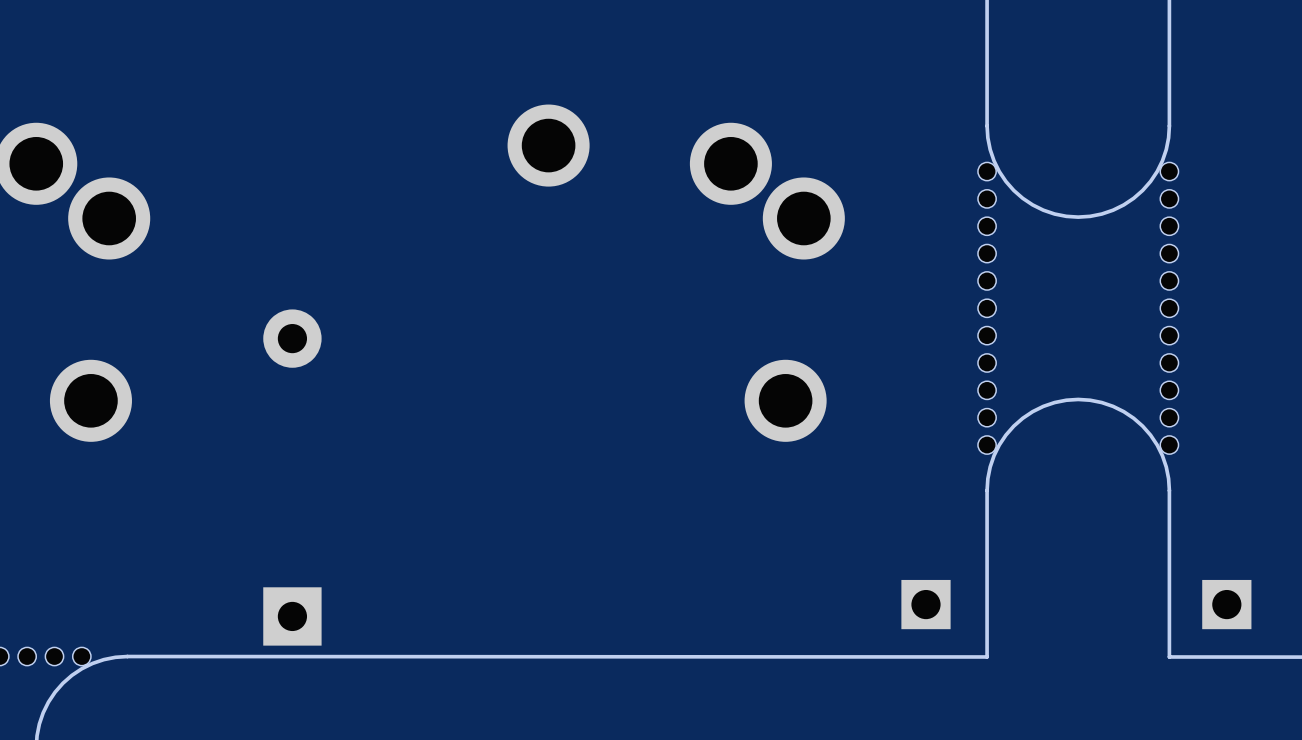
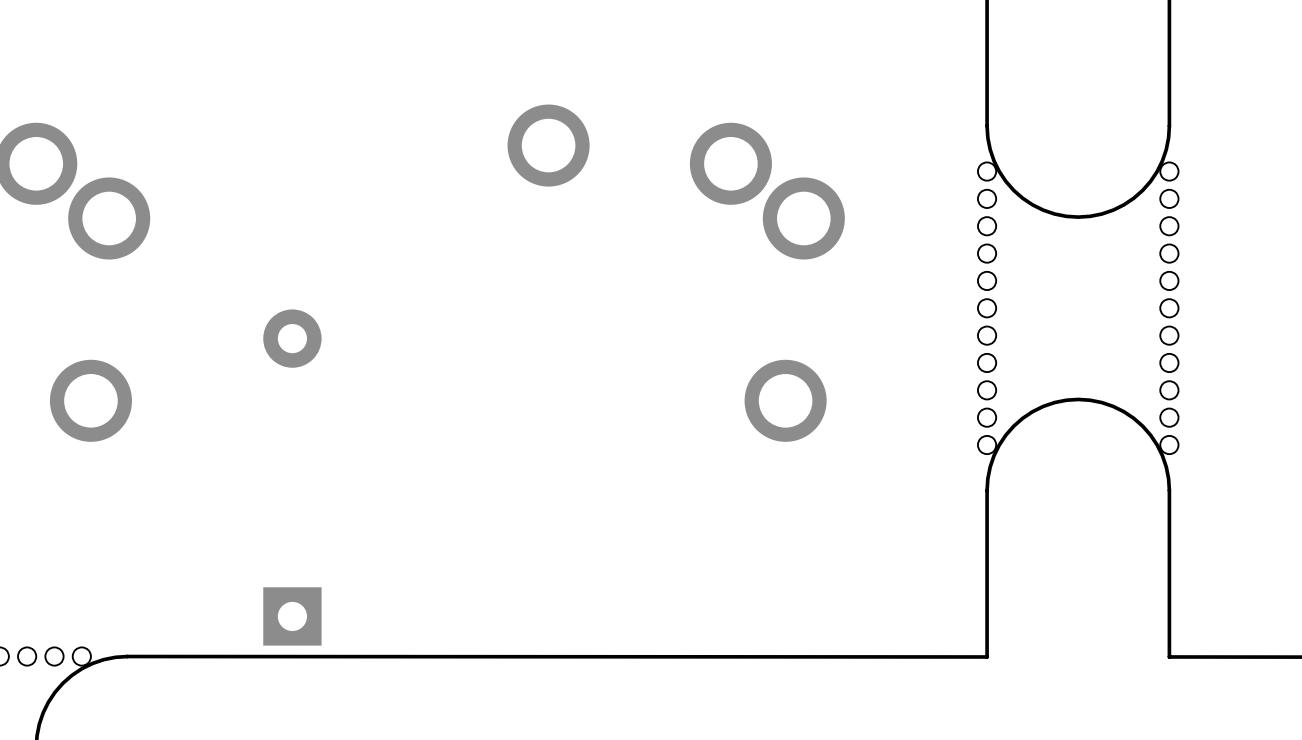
part: (925, 604) -> none
part: (1226, 604) -> none

